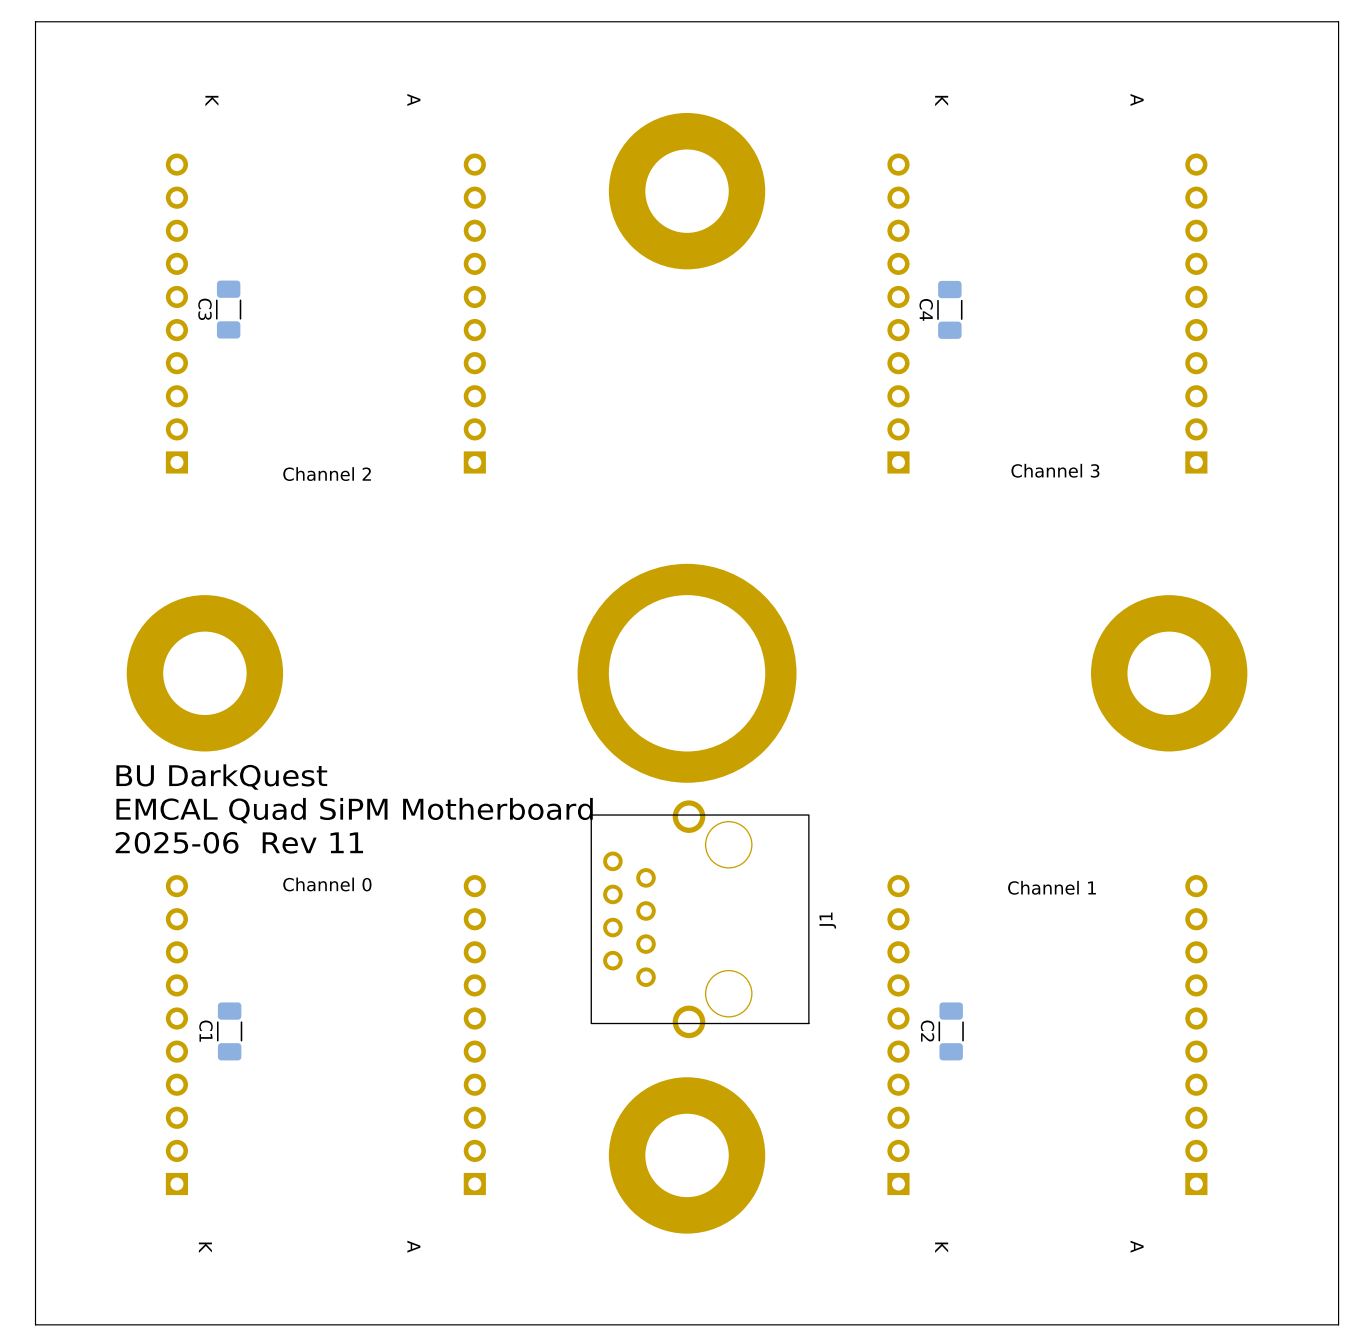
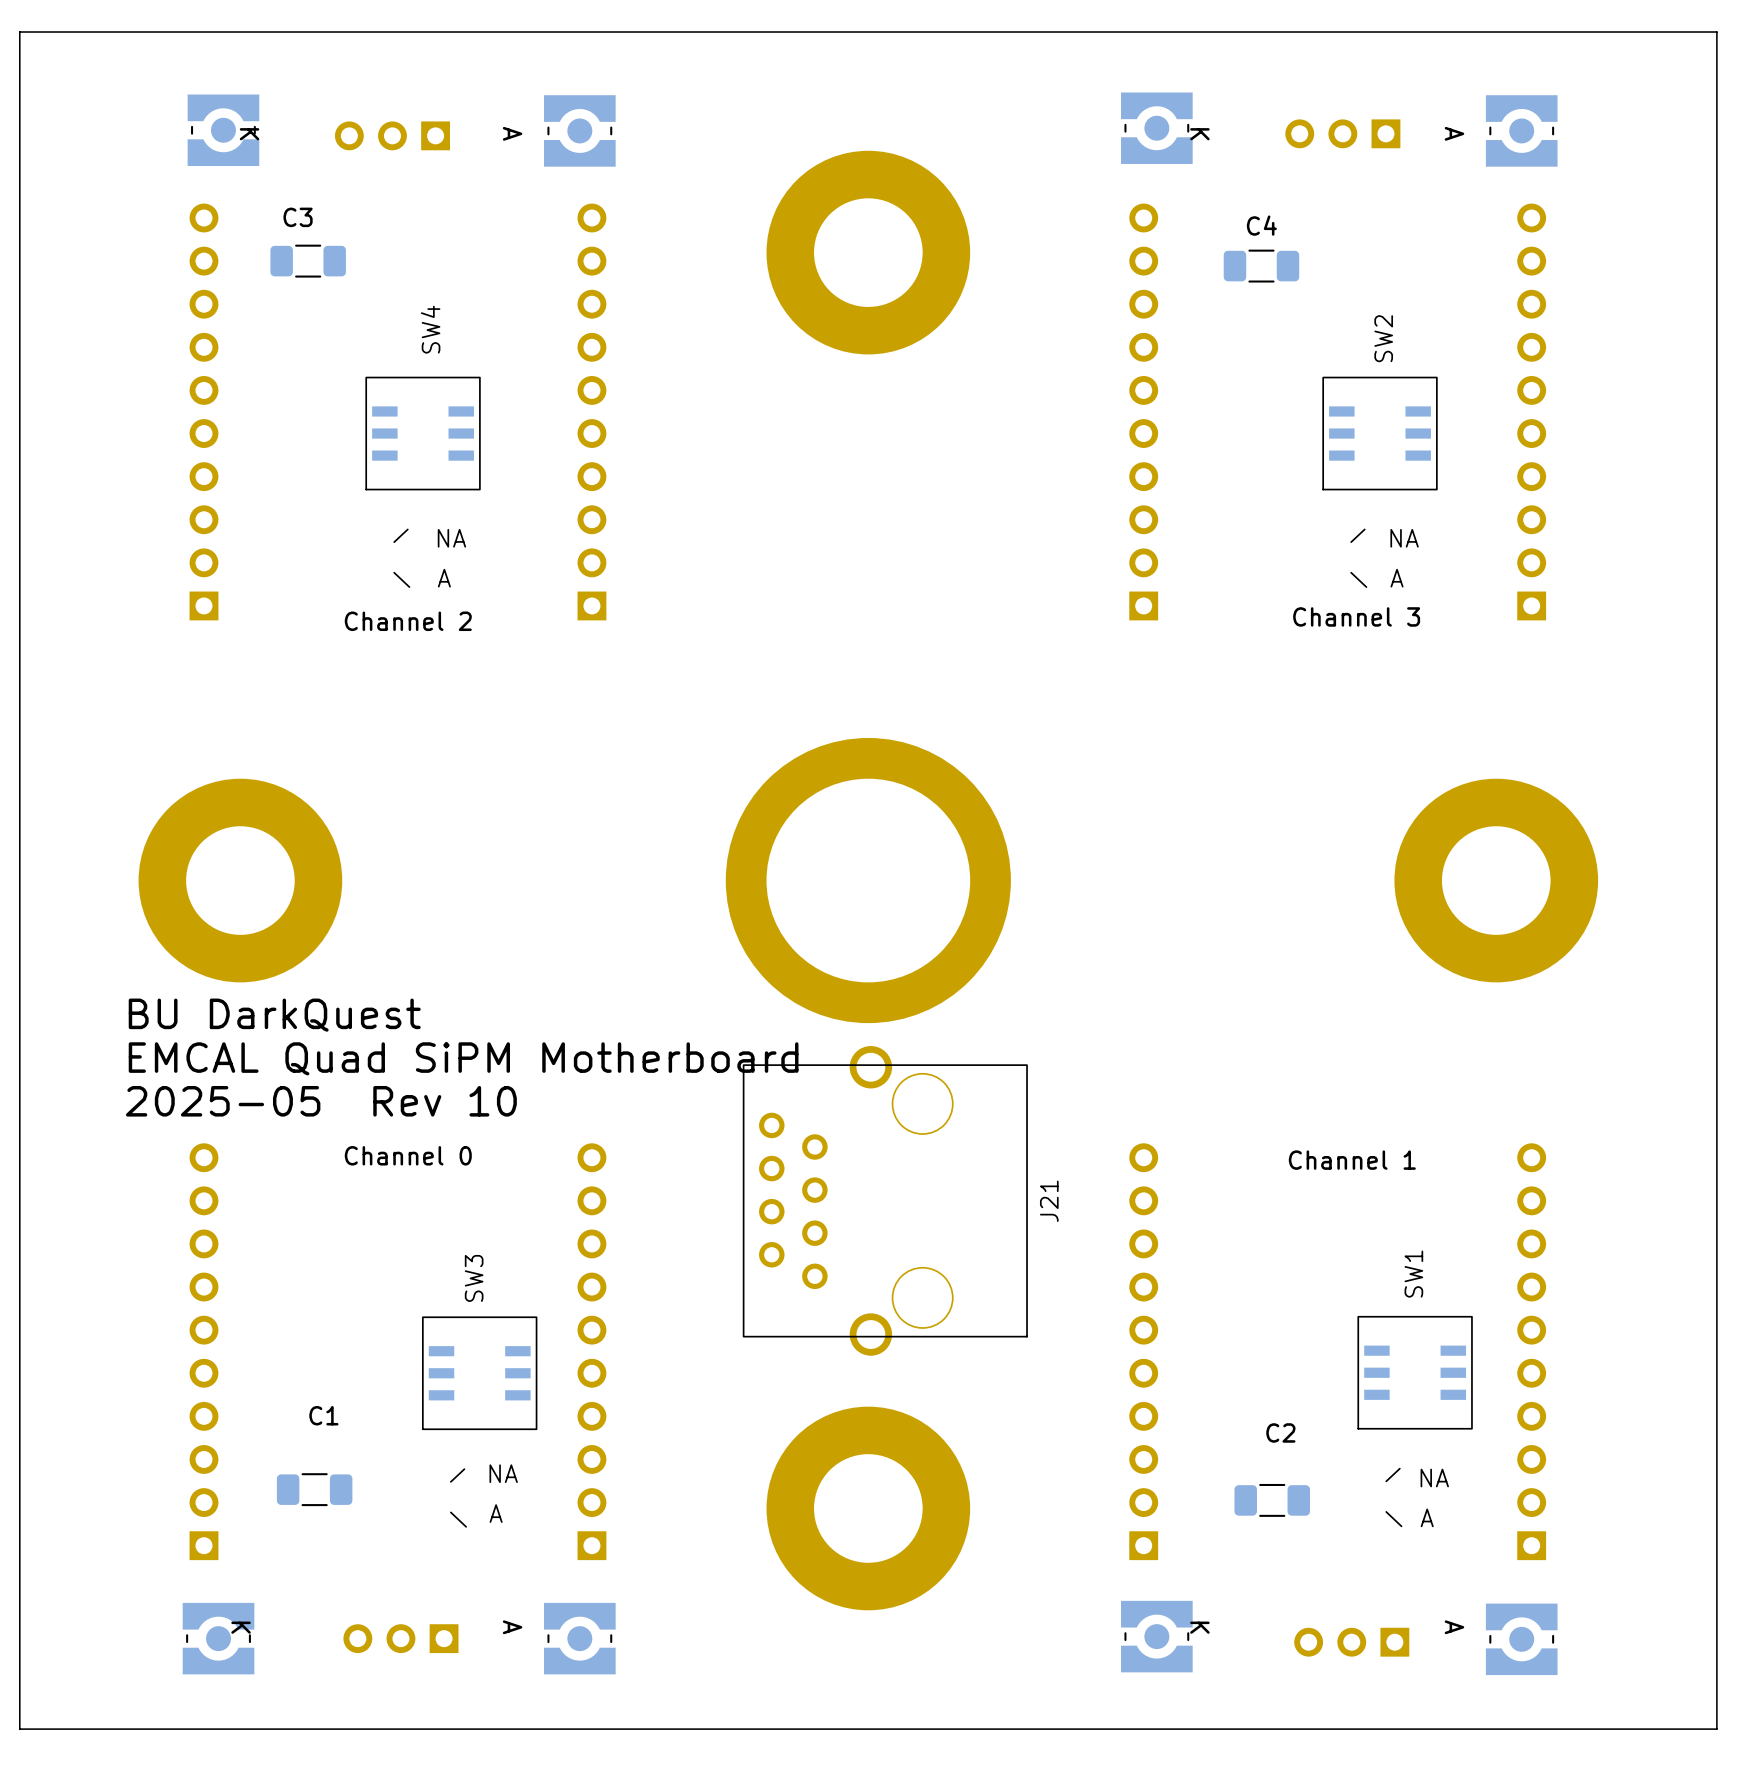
part: none -> (1156, 128)
part: none -> (223, 130)
part: none -> (579, 130)
part: none -> (1521, 130)
part: none -> (1342, 133)
part: none -> (392, 135)
C3 rotation: 0° (228, 309) -> 90° clockwise (308, 261)
C3 position: (228, 309) -> (308, 261)
C4 rotation: 0° (949, 309) -> 90° clockwise (1261, 266)
C4 position: (949, 309) -> (1261, 266)
SW4: none -> (423, 482)
SW2: none -> (1380, 482)
text: 2025-06 Rev 11 (239, 842) -> 2025-05 Rev 10 (321, 1101)
J1 name: J1 (827, 920) -> J21 (1049, 1201)
C1 name position: C1 (206, 1031) -> C1 (323, 1415)
C1 rotation: 0° (229, 1031) -> 90° clockwise (314, 1489)
C1 position: (229, 1031) -> (314, 1489)
C2 name position: C2 (927, 1031) -> C2 (1280, 1432)
C2 rotation: 0° (951, 1031) -> 90° clockwise (1272, 1500)
C2 position: (951, 1031) -> (1272, 1500)
SW1: none -> (1415, 1421)
SW3: none -> (479, 1422)
part: none -> (1156, 1636)
part: none -> (218, 1638)
part: none -> (400, 1638)
part: none -> (579, 1638)
part: none -> (1521, 1639)
part: none -> (1351, 1642)

